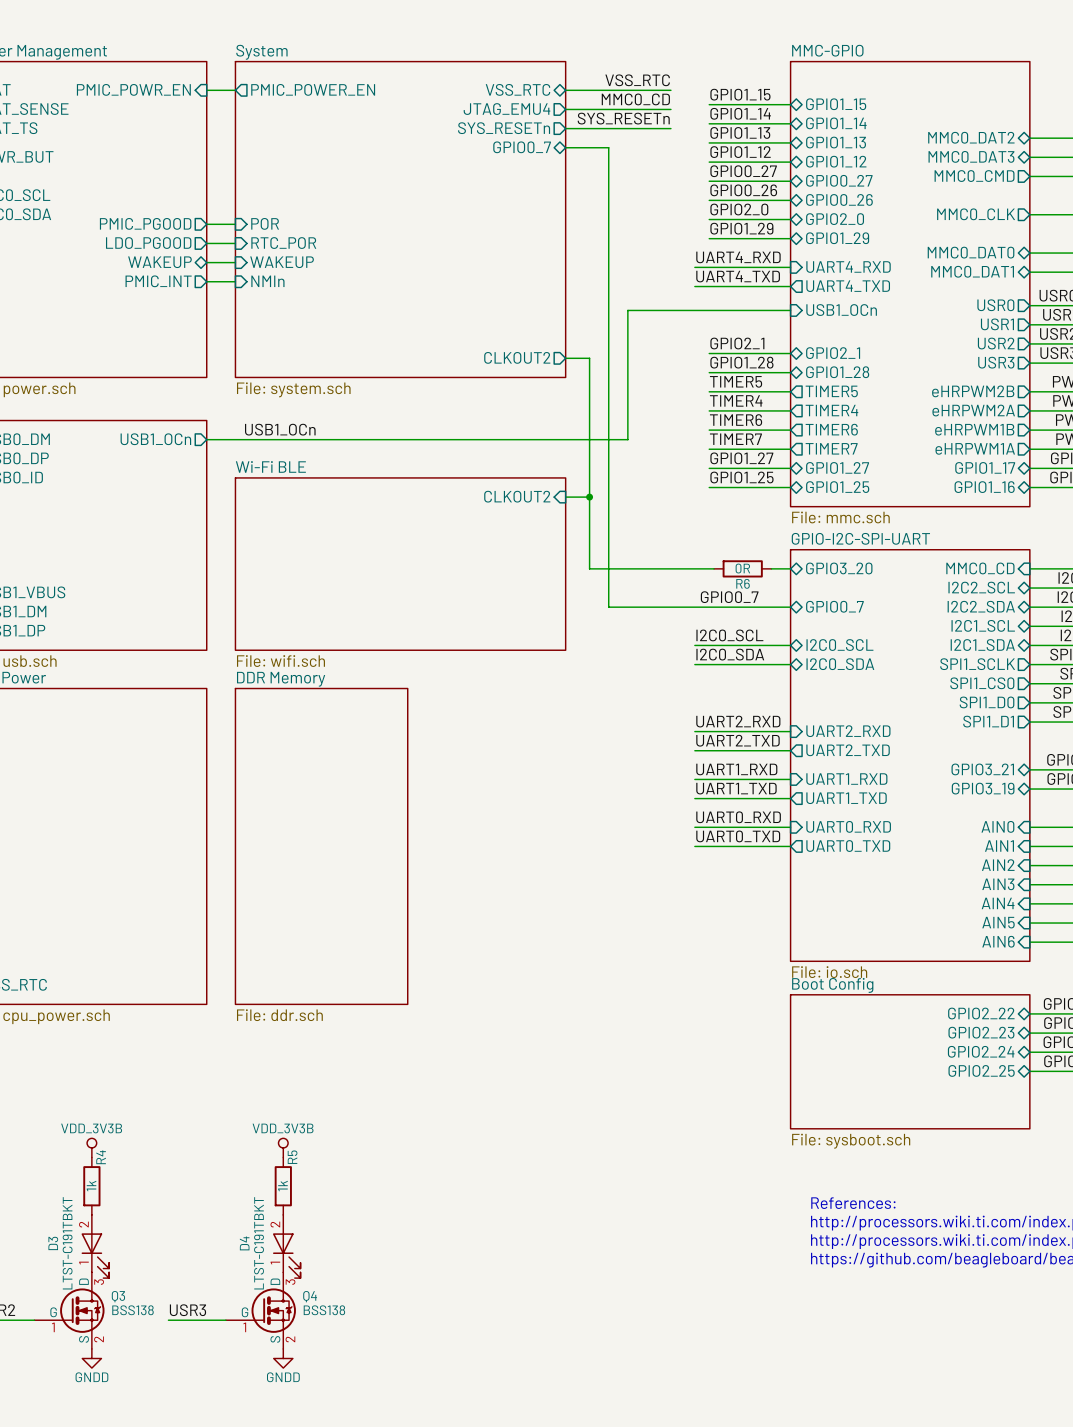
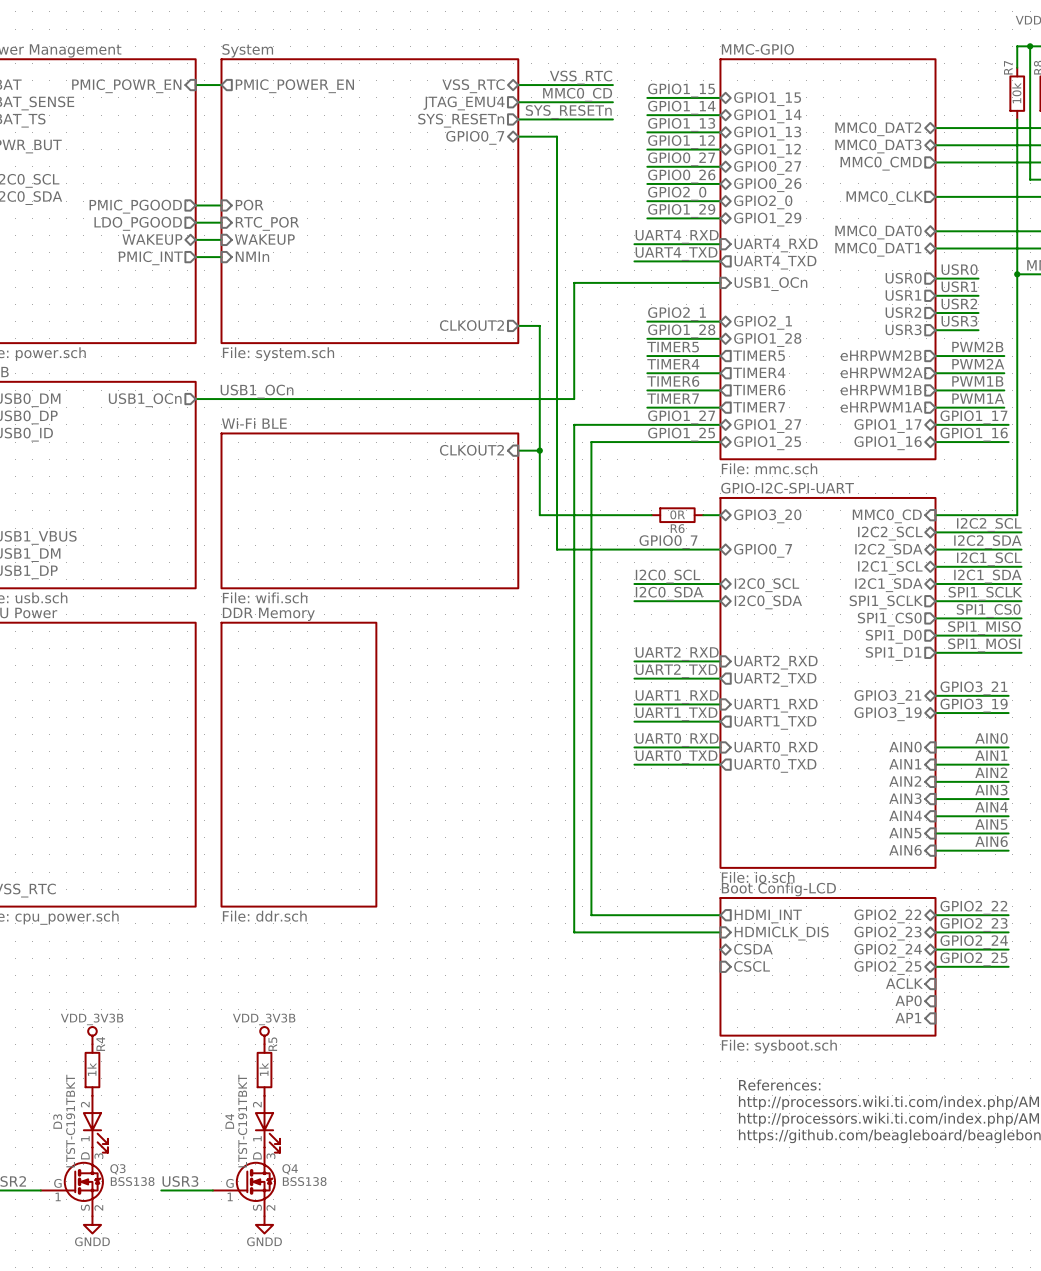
wire: none -> (647, 424) (574, 424) (574, 932) (720, 932)
wire: none -> (647, 442) (591, 442) (591, 915) (720, 915)
sheet pin: none -> HDMI_INT (768, 916)
sheet pin: none -> HDMICLK_DIS (781, 933)
sheet pin: none -> CSDA (753, 949)
sheet Boot Config: File: sysboot.sch (910, 1061) -> none
sheet pin: none -> CSCL (752, 966)
sheet Boot Config-LCD: none -> File: sysboot.sch (827, 966)
sheet pin: none -> ACLK (904, 983)
sheet pin: none -> AP0 (908, 1000)
sheet pin: none -> AP1 (908, 1018)

